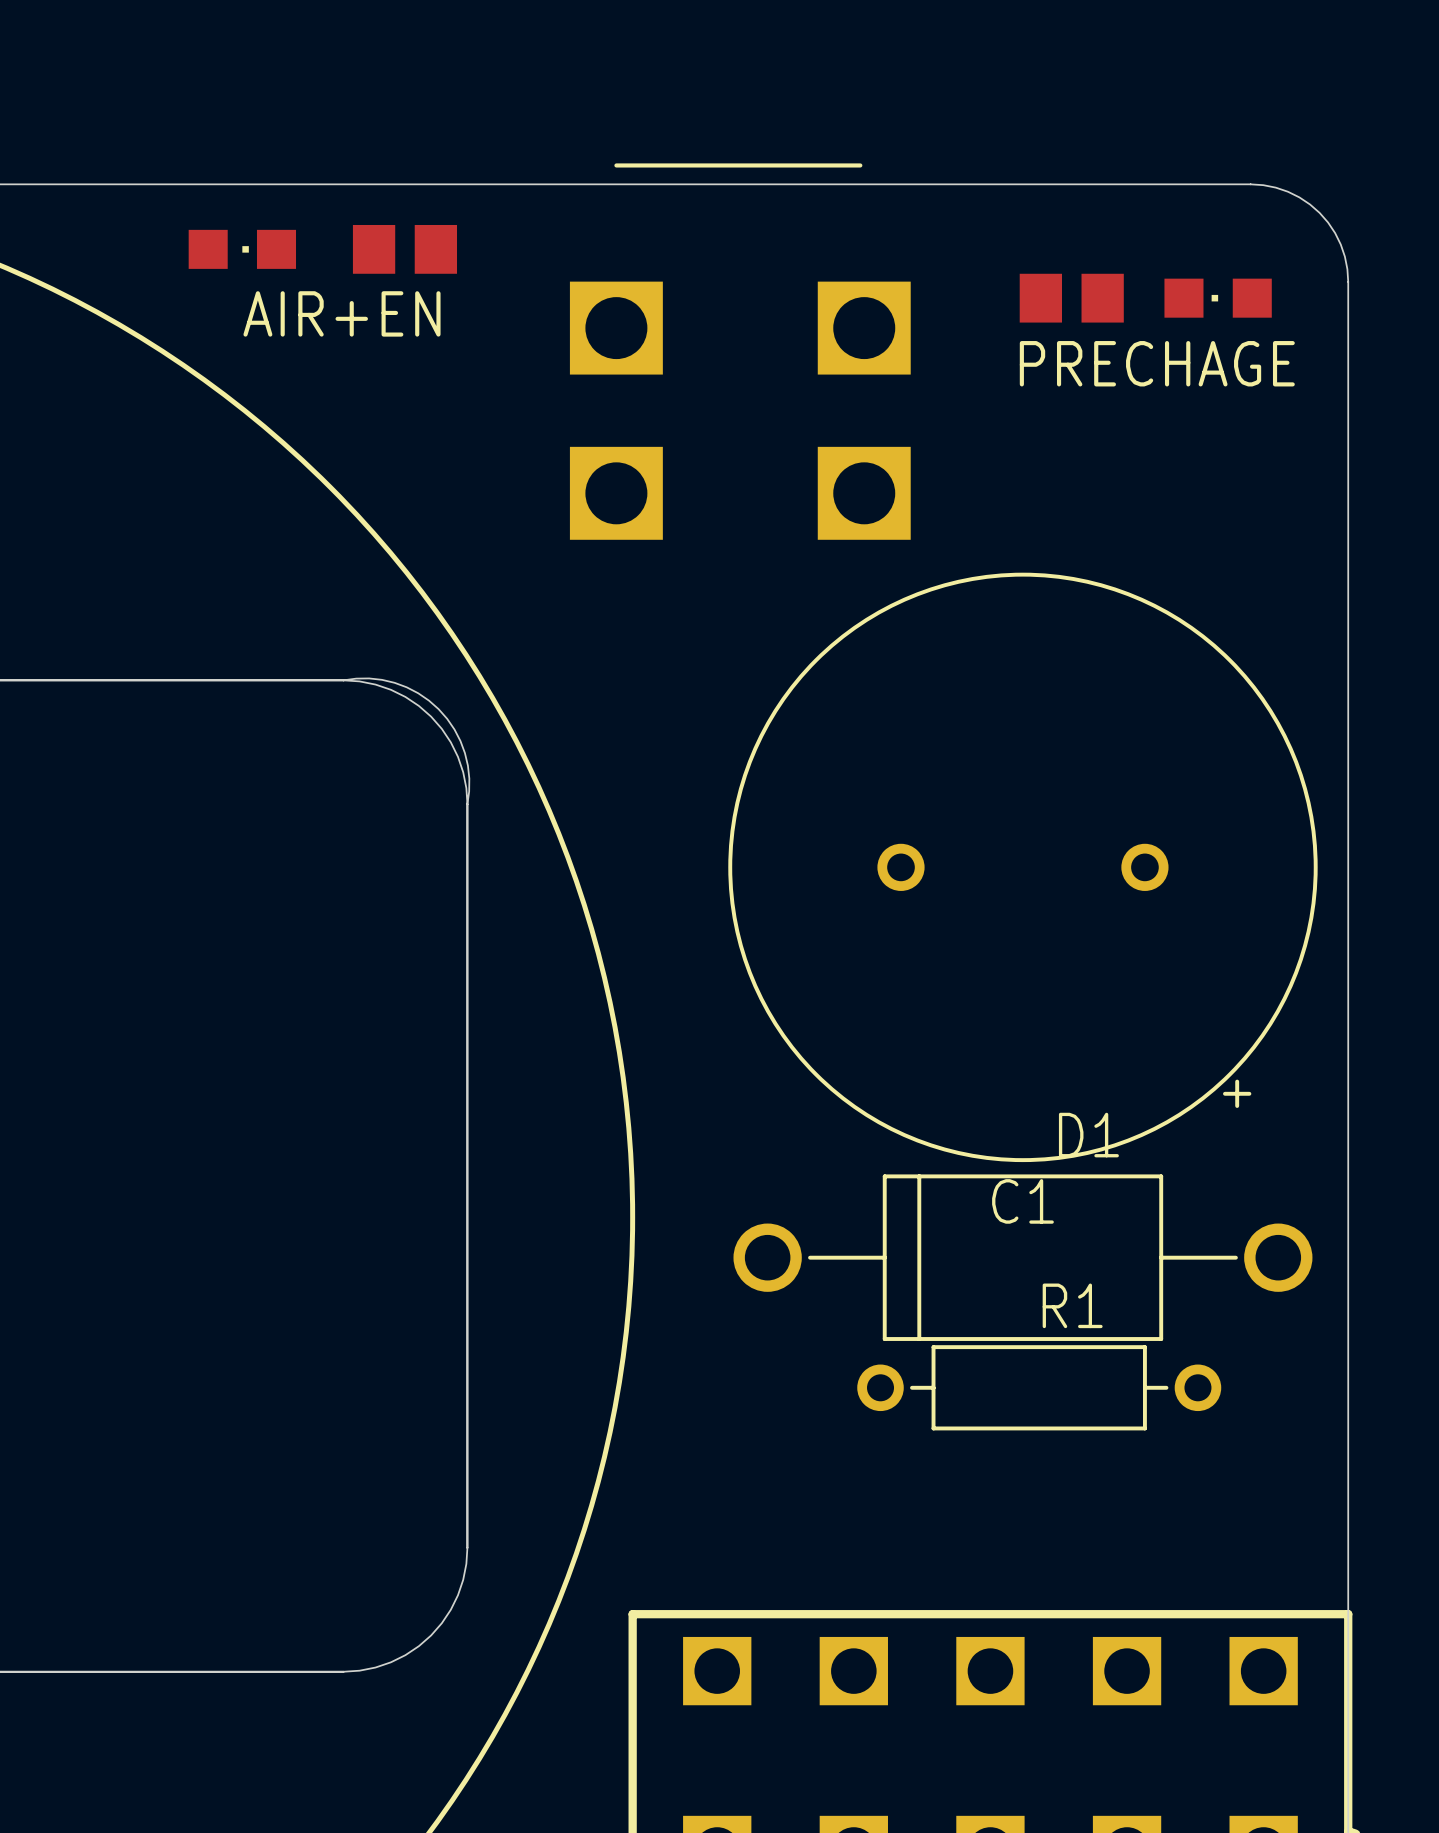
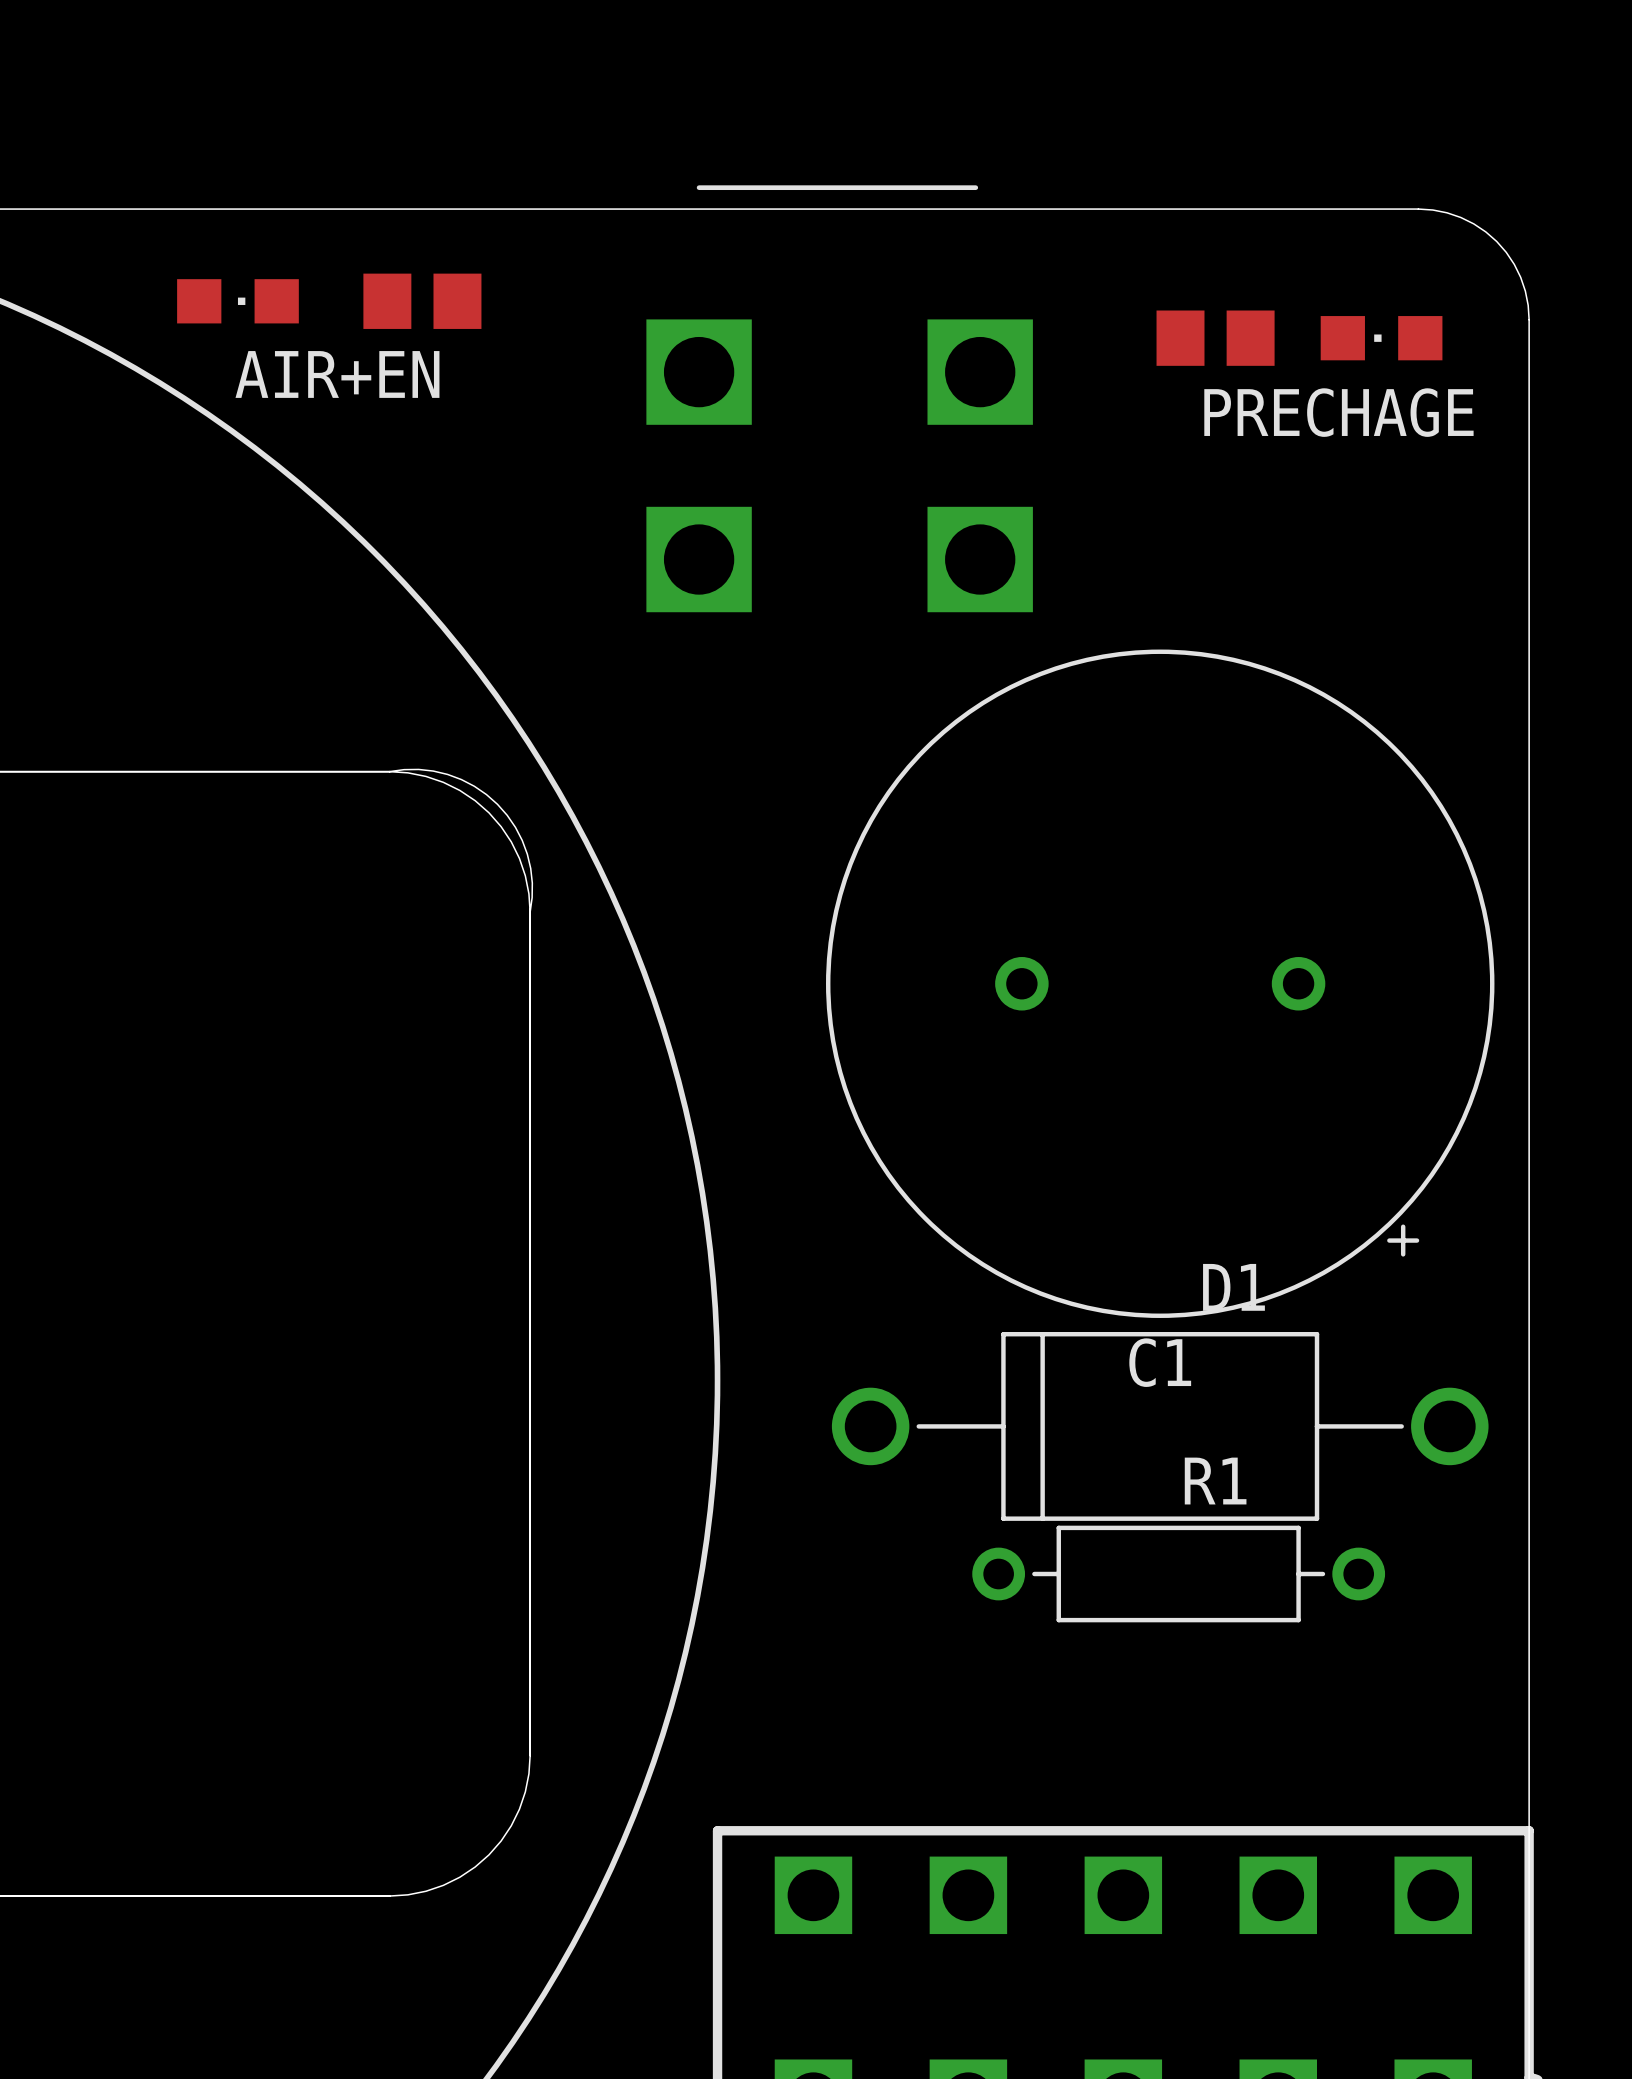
AIR+EN position: (242, 249) -> (237, 301)
part position: (404, 249) -> (422, 301)

